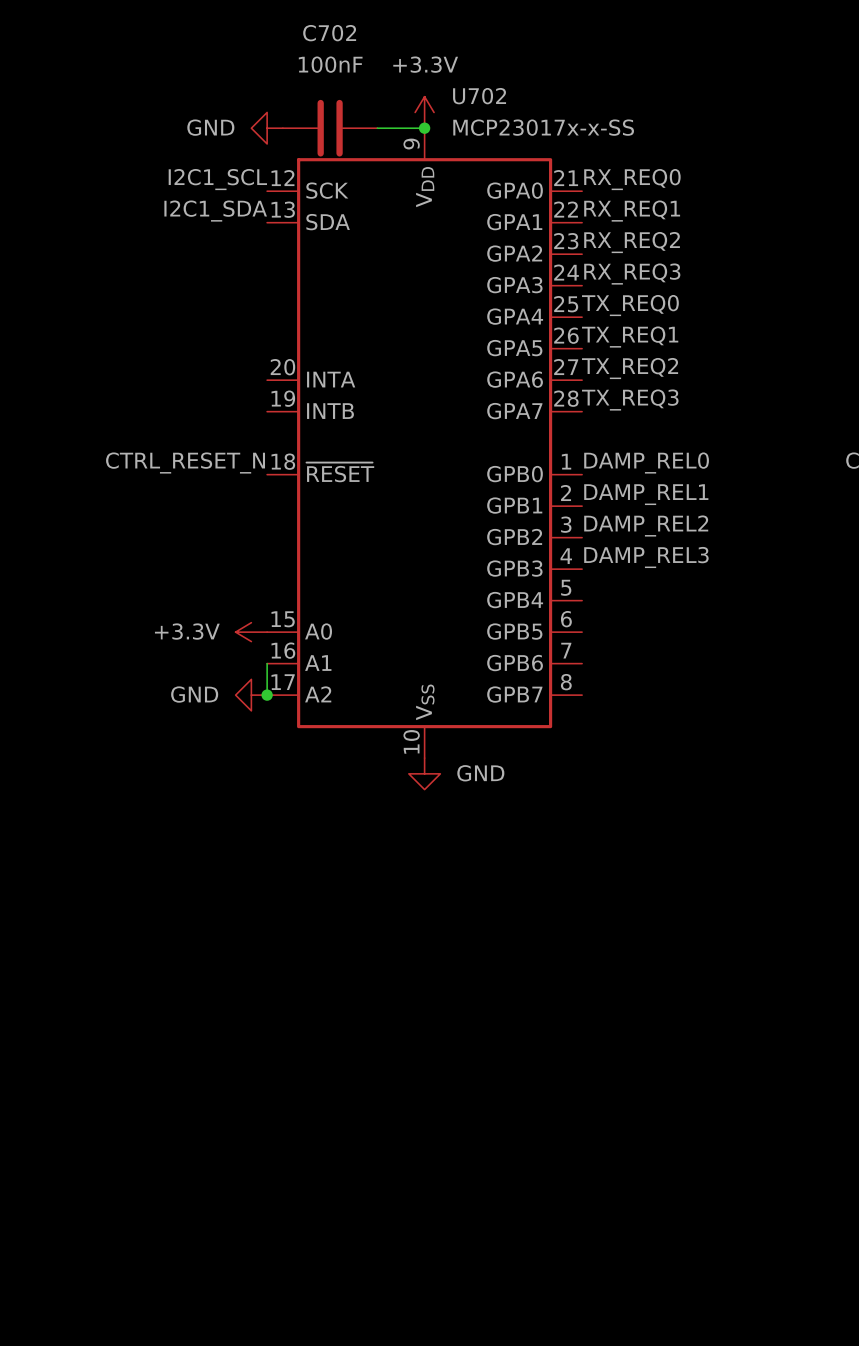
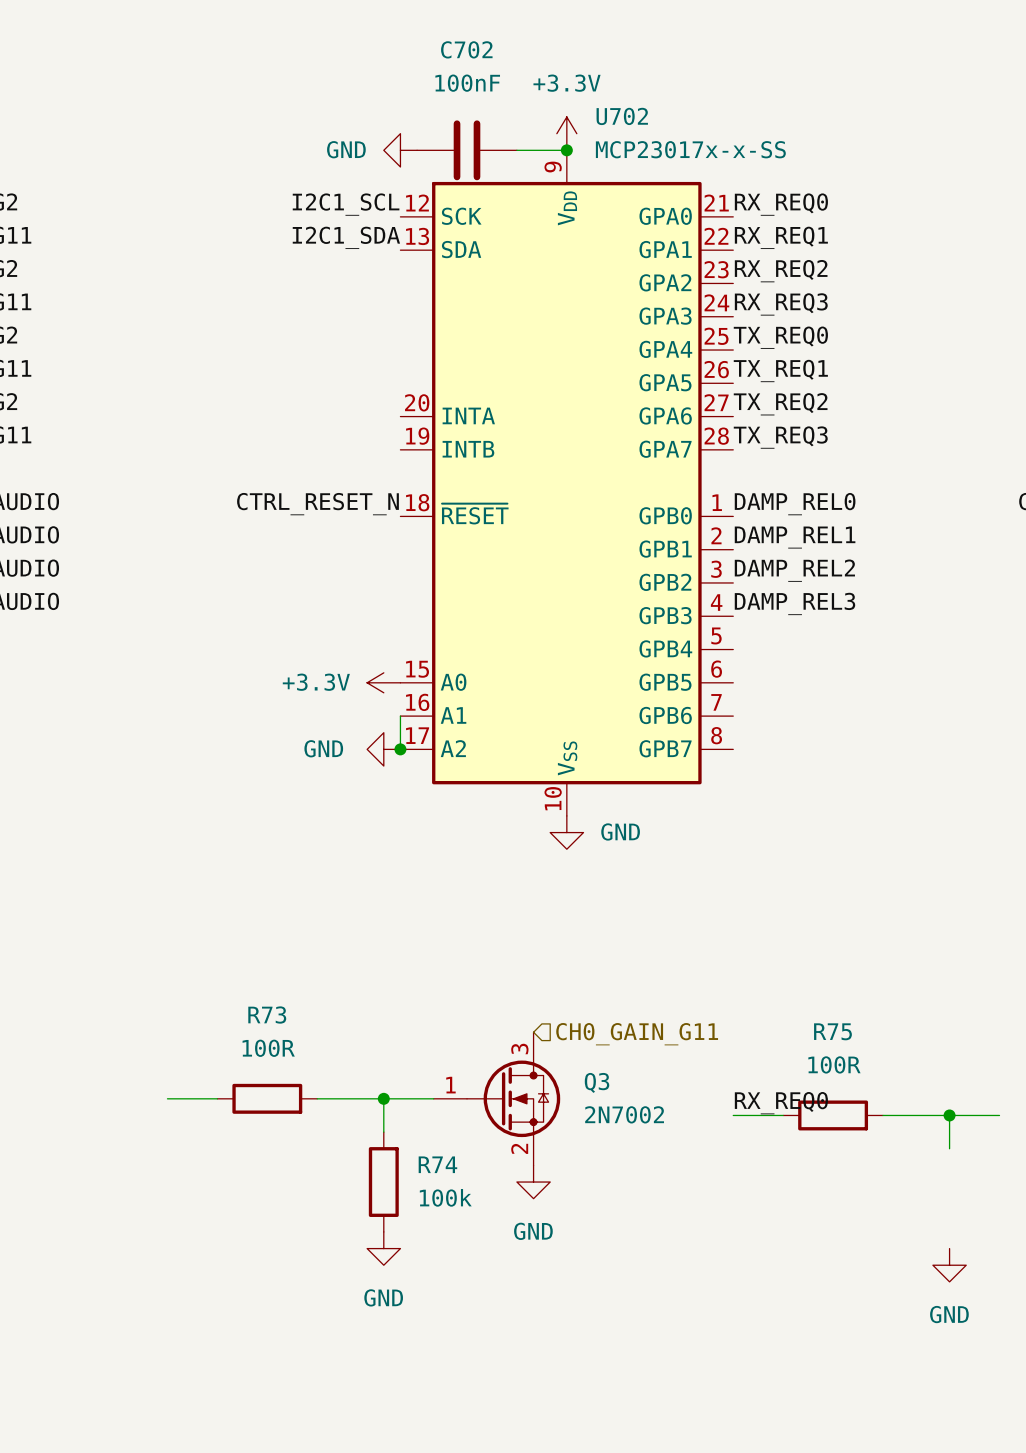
hierarchical label: none -> CH0_GAIN_G11 (637, 1034)
wire: none -> (167, 1098) (217, 1098)
R73: none -> 100R (267, 1098)
wire: none -> (317, 1098) (433, 1098)
wire: none -> (383, 1098) (383, 1132)
junction: none -> (383, 1098)
Q3: none -> 2N7002 (496, 1098)
label: none -> RX_REQ0 (781, 1103)
wire: none -> (733, 1115) (783, 1115)
R75: none -> 100R (833, 1115)
wire: none -> (883, 1115) (999, 1115)
wire: none -> (949, 1115) (949, 1148)
junction: none -> (949, 1115)
R74: none -> 100k (383, 1182)
power symbol: none -> GND (533, 1182)
power symbol: none -> GND (383, 1248)
power symbol: none -> GND (949, 1265)

